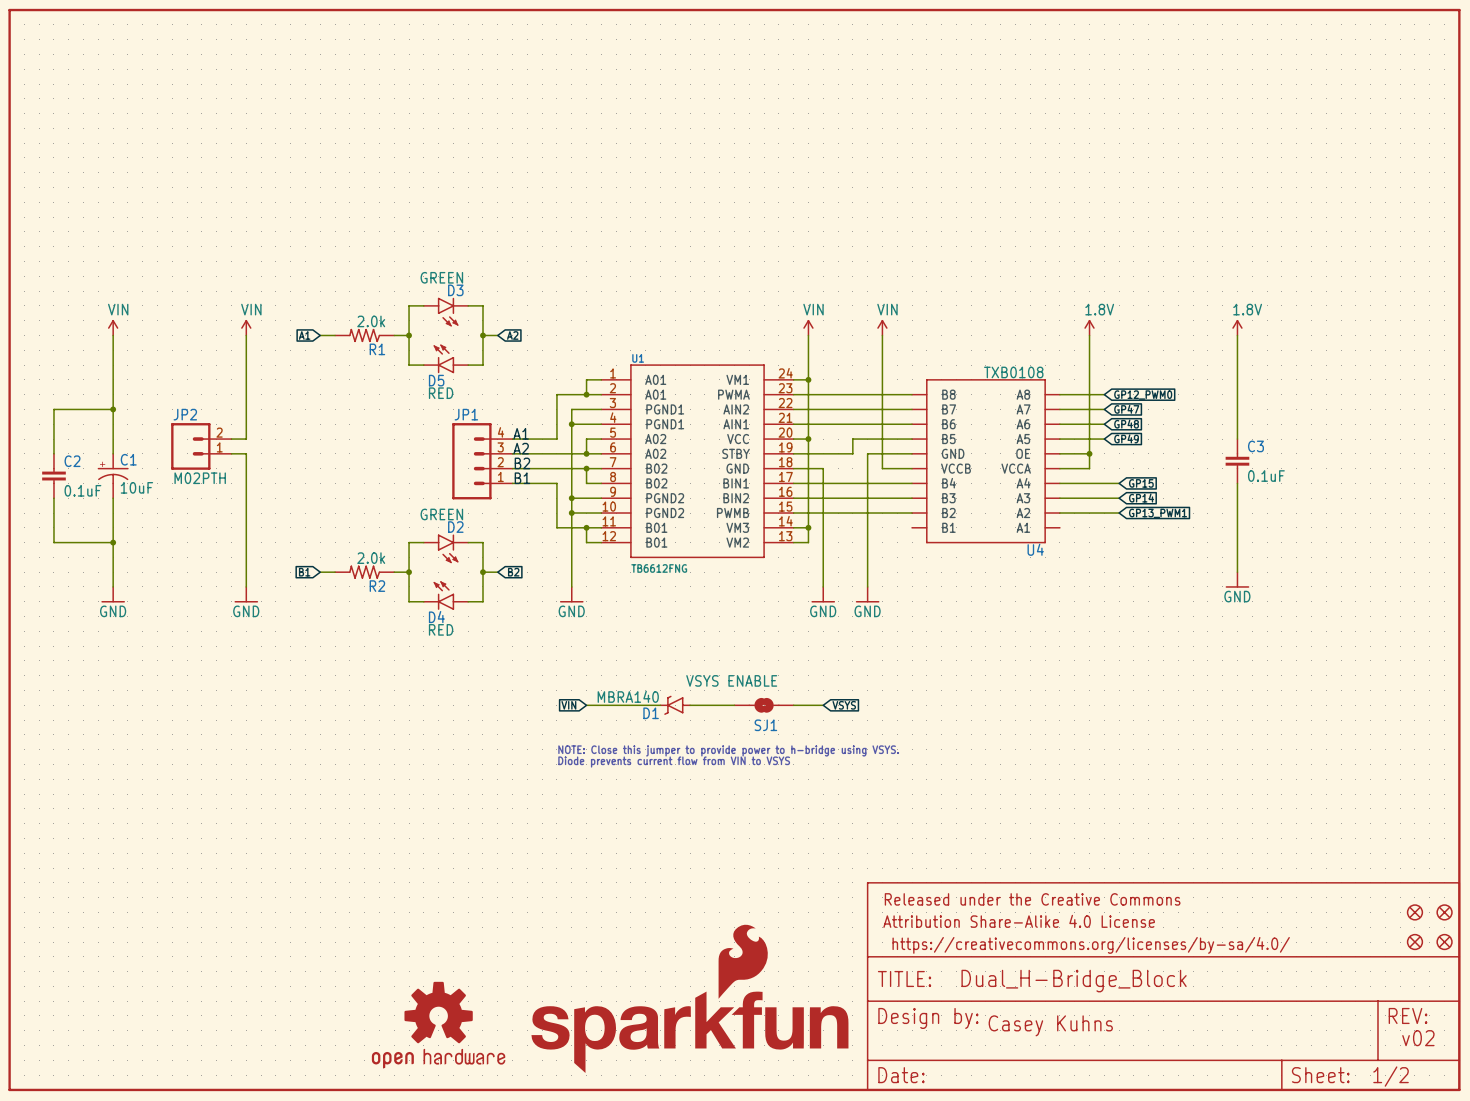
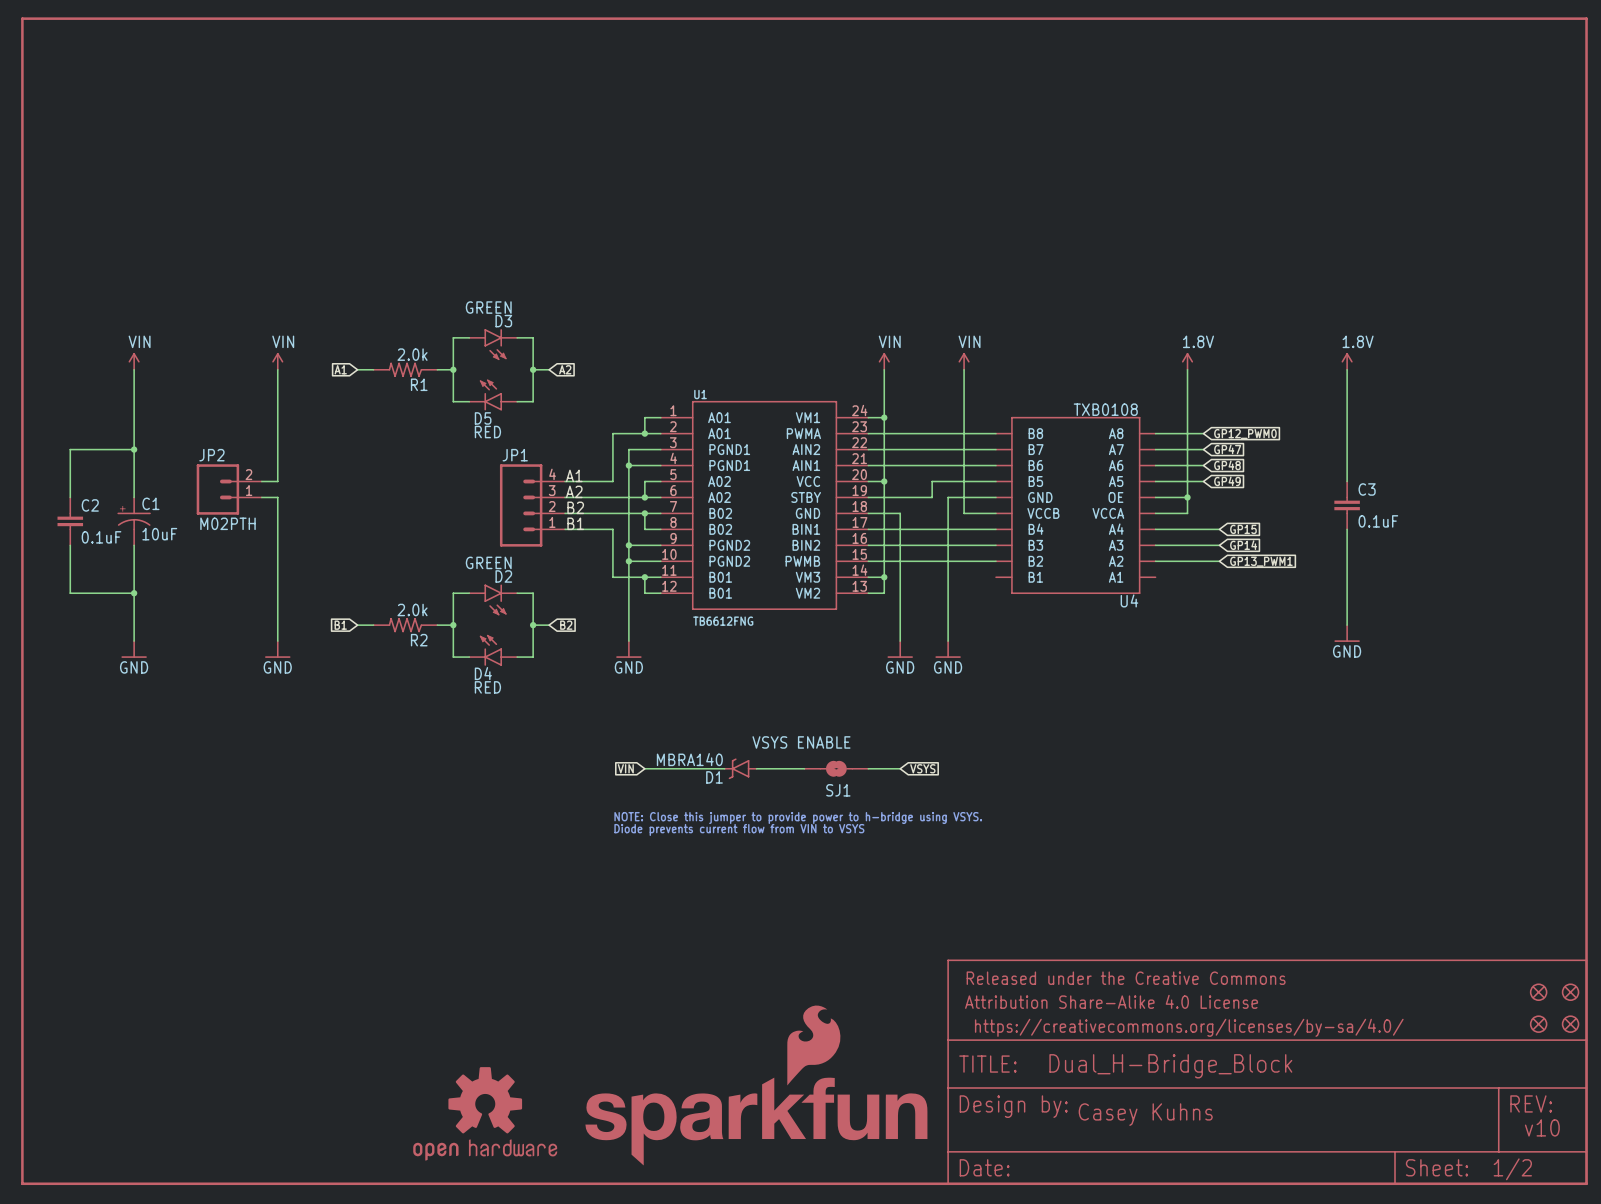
text: v02 (1418, 1038) -> v10 (1542, 1127)

